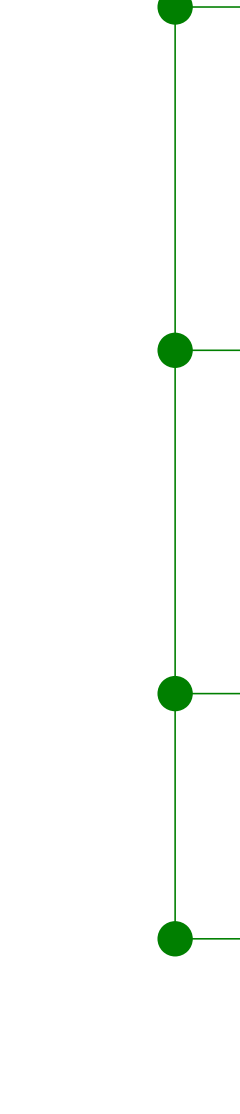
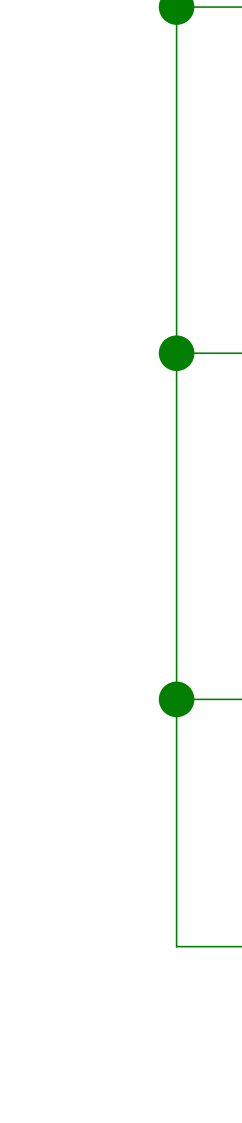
junction: (175, 938) -> none

